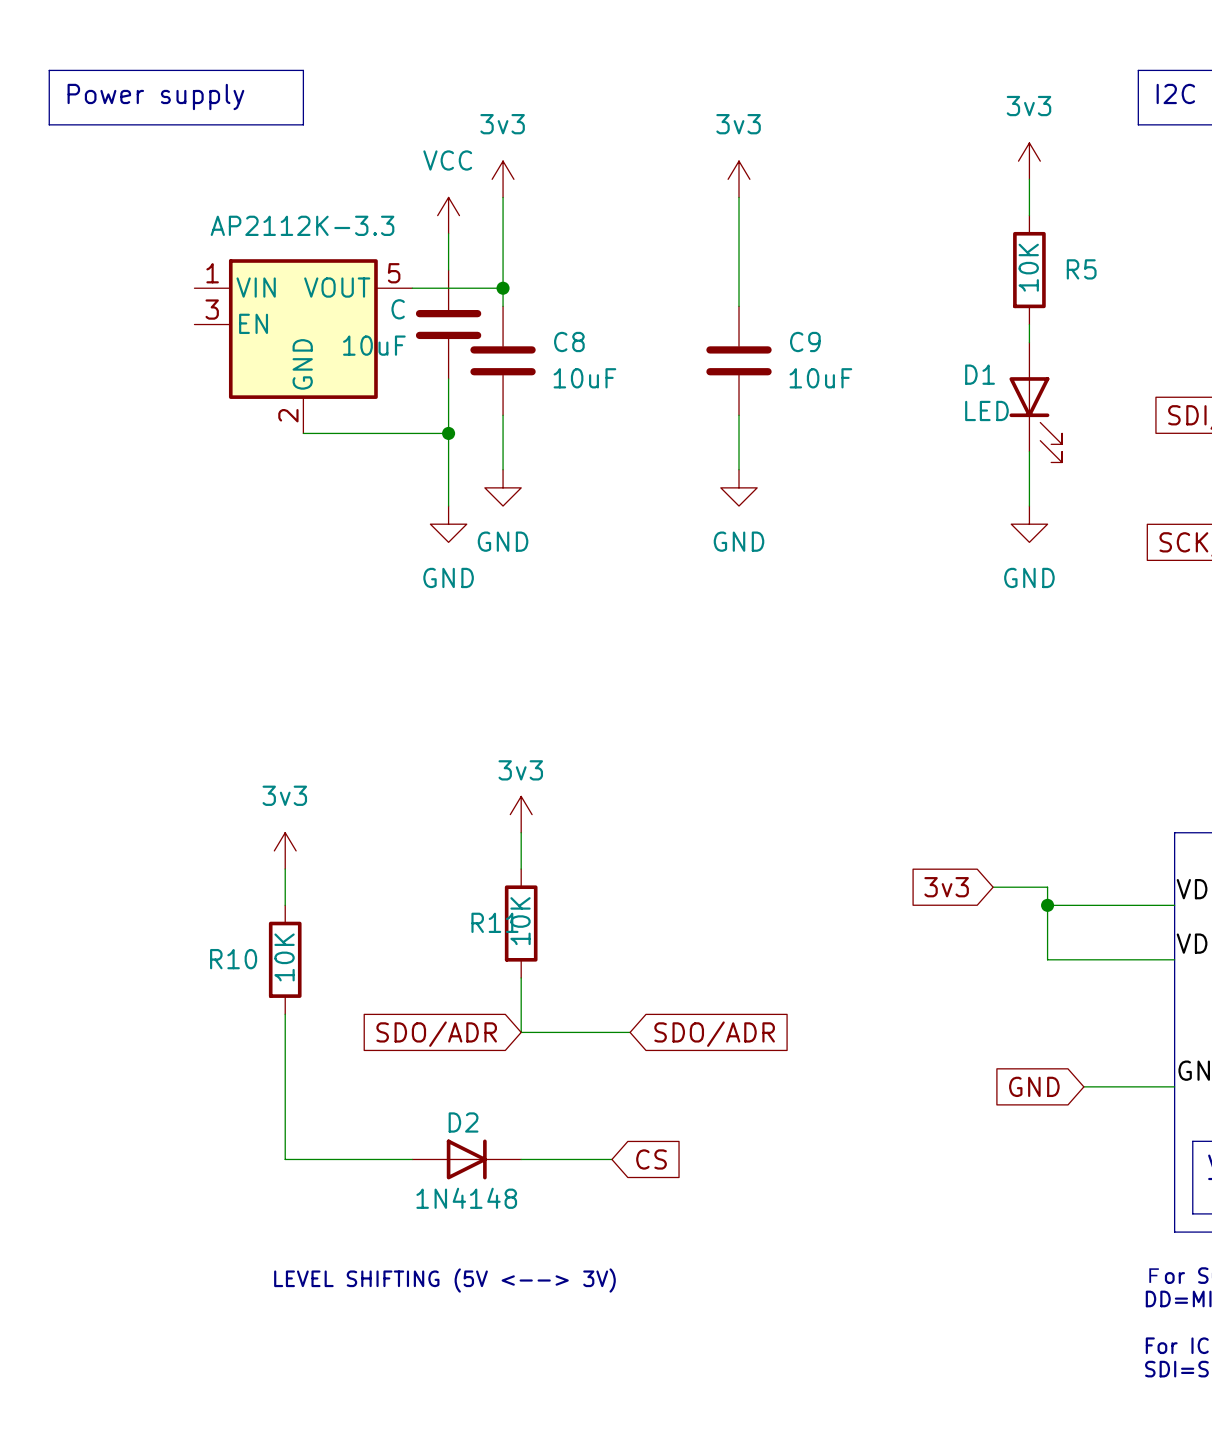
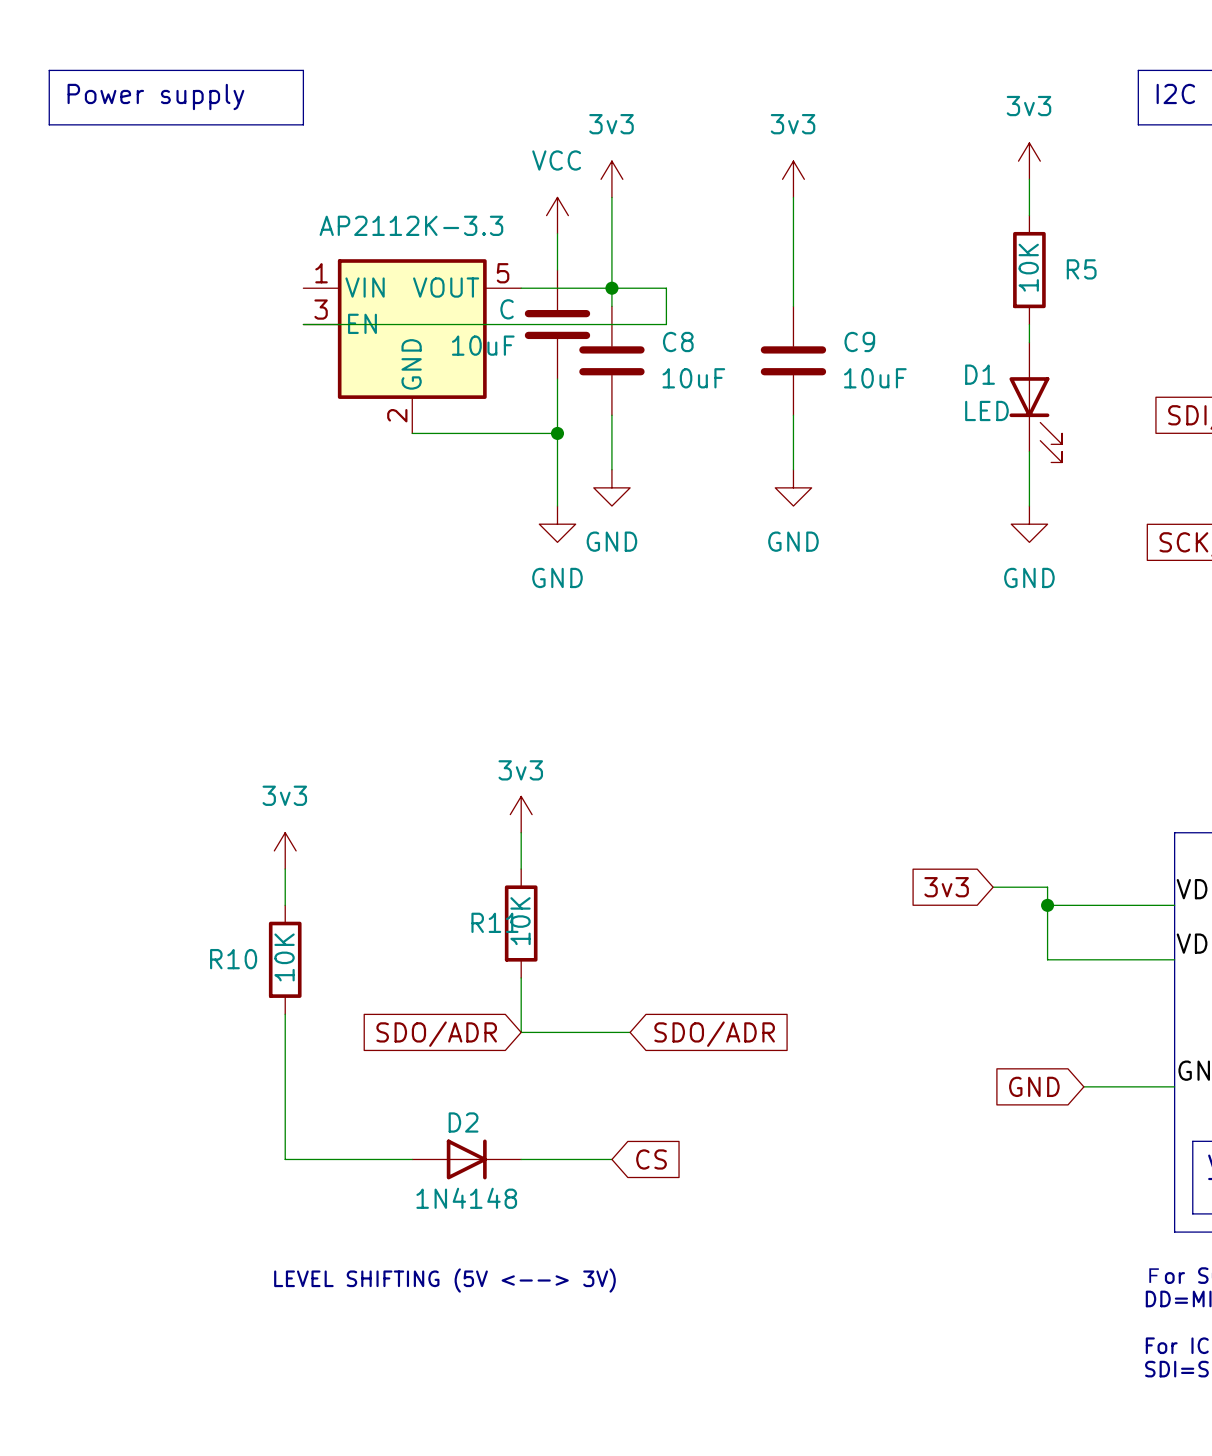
power symbol: 3v3 (503, 179) -> none
power symbol: none -> 3v3 (611, 179)
power symbol position: 3v3 (739, 179) -> 3v3 (793, 179)
wire: (503, 197) (503, 306) -> (611, 197) (611, 306)
wire: (739, 197) (739, 306) -> (793, 197) (793, 306)
power symbol position: VCC (448, 215) -> VCC (557, 215)
wire: (448, 233) (448, 270) -> (557, 233) (557, 270)
junction: (503, 288) -> none
wire: none -> (521, 288) (666, 288) (666, 324) (303, 324)
junction: none -> (611, 288)
C position: (448, 324) -> (557, 324)
part position: (303, 346) -> (412, 346)
C8 position: (503, 360) -> (611, 360)
C9 position: (739, 360) -> (793, 360)
wire: (448, 378) (448, 506) -> (557, 378) (557, 506)
wire: (503, 415) (503, 469) -> (611, 415) (611, 469)
wire: (739, 415) (739, 469) -> (793, 415) (793, 469)
wire: (303, 433) (412, 433) -> (448, 433) (557, 433)
junction: (448, 433) -> none
junction: none -> (557, 433)
power symbol: GND (503, 487) -> none
power symbol: none -> GND (611, 487)
power symbol position: GND (739, 487) -> GND (793, 487)
power symbol: GND (448, 524) -> none
power symbol: none -> GND (557, 524)

